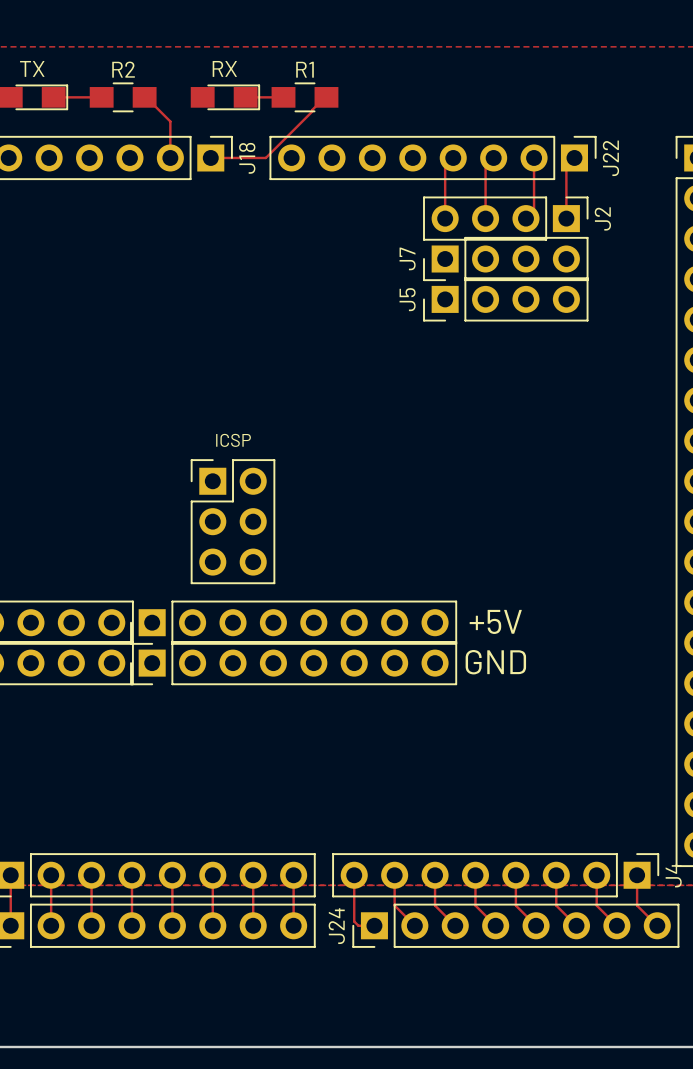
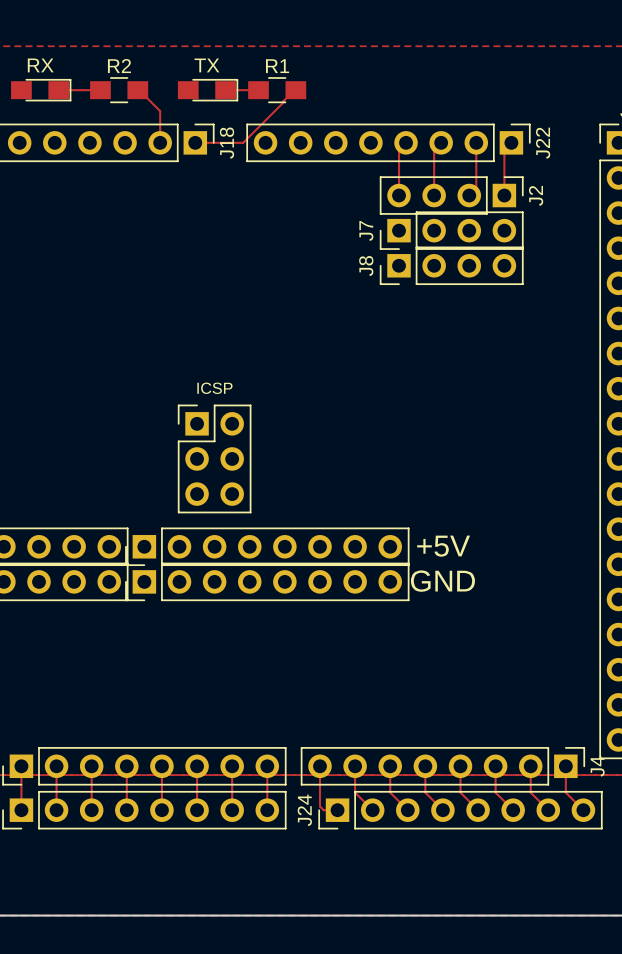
part value: TX (32, 68) -> RX (40, 65)
part value: RX (224, 68) -> TX (206, 65)
J5 name: J5 (407, 299) -> J8 (366, 266)

